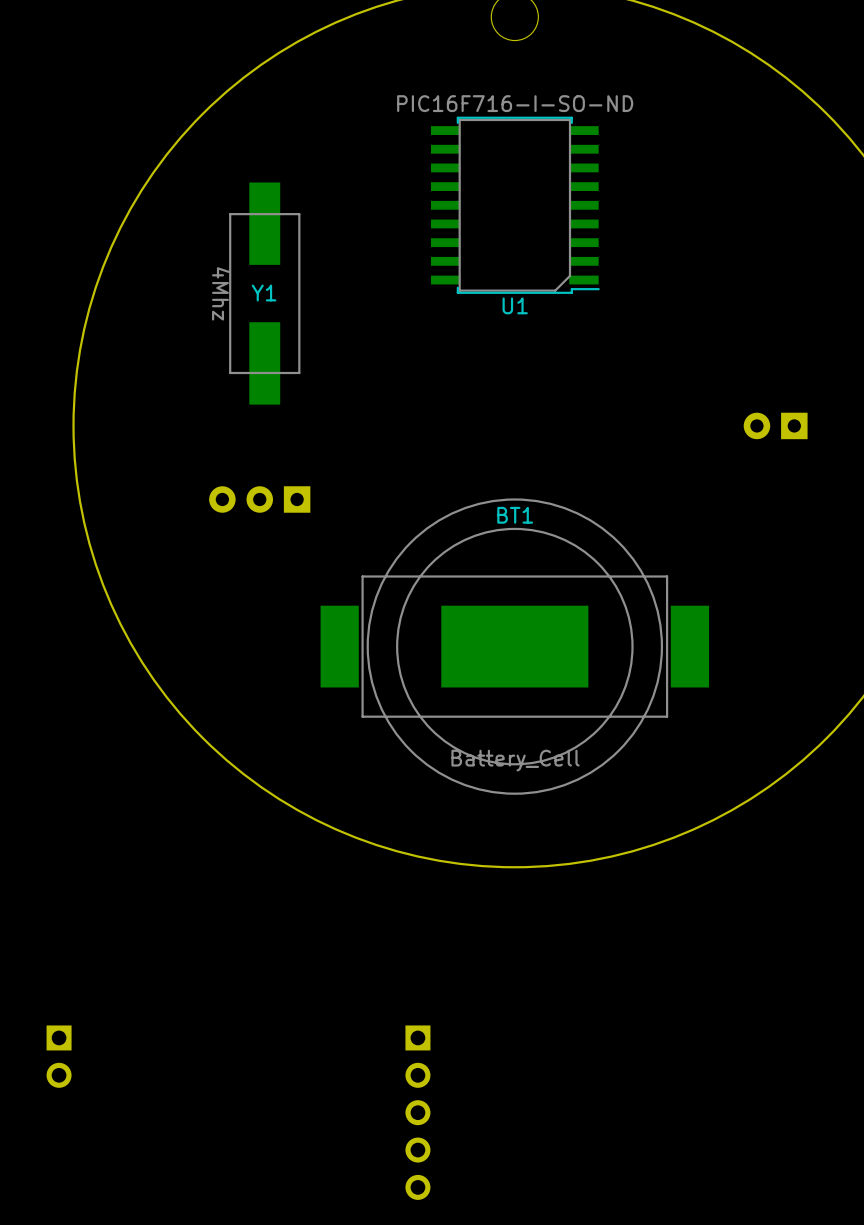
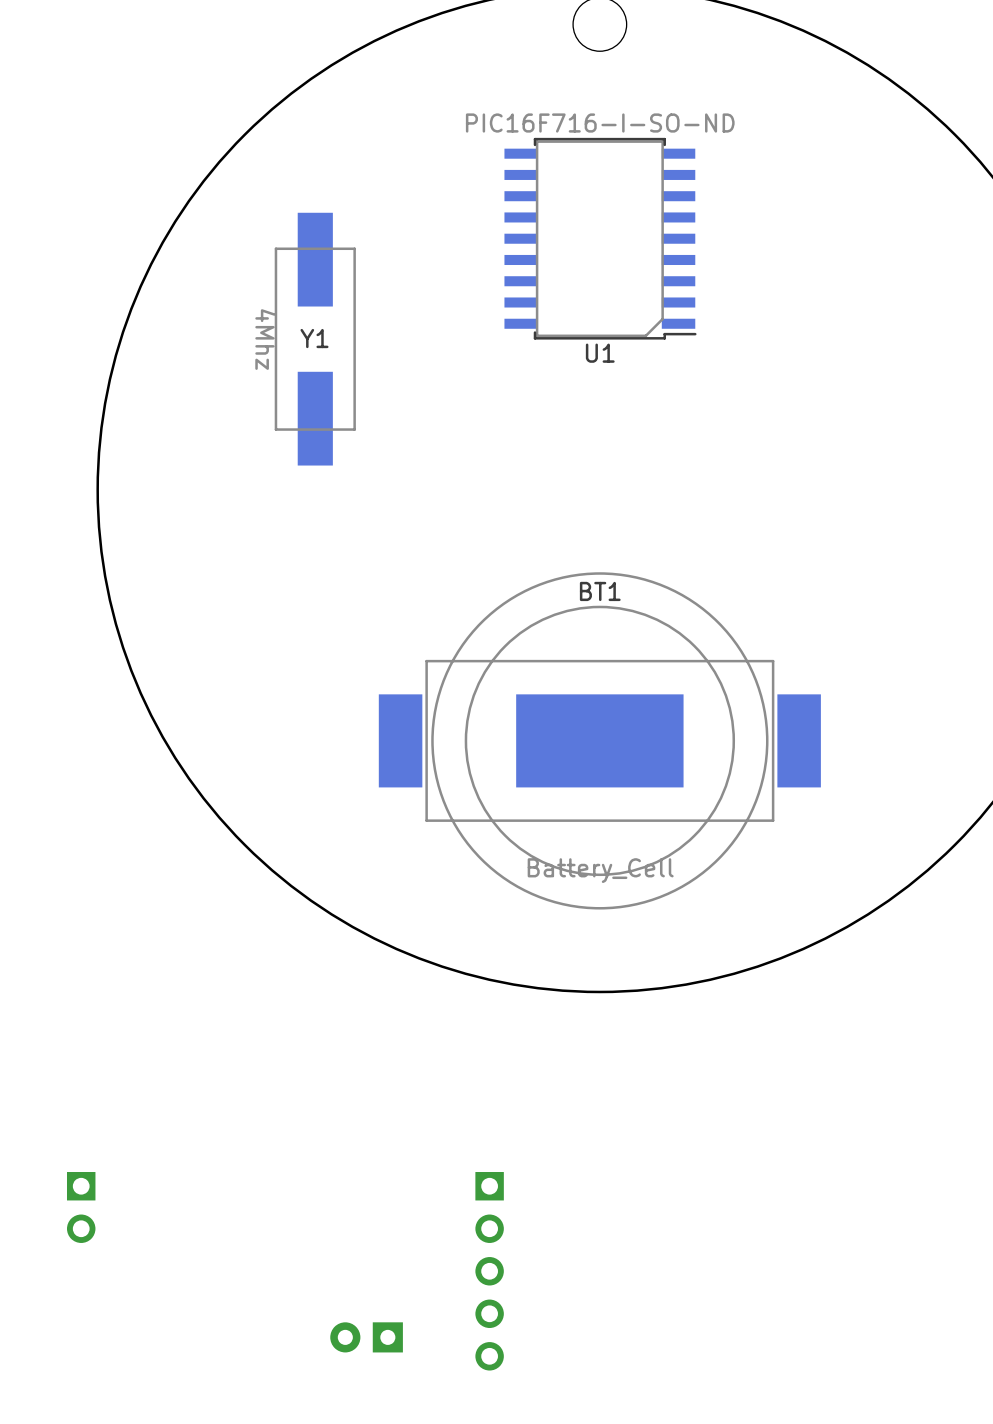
part: (775, 425) -> none
part: (259, 499) -> none
part: none -> (366, 1337)

